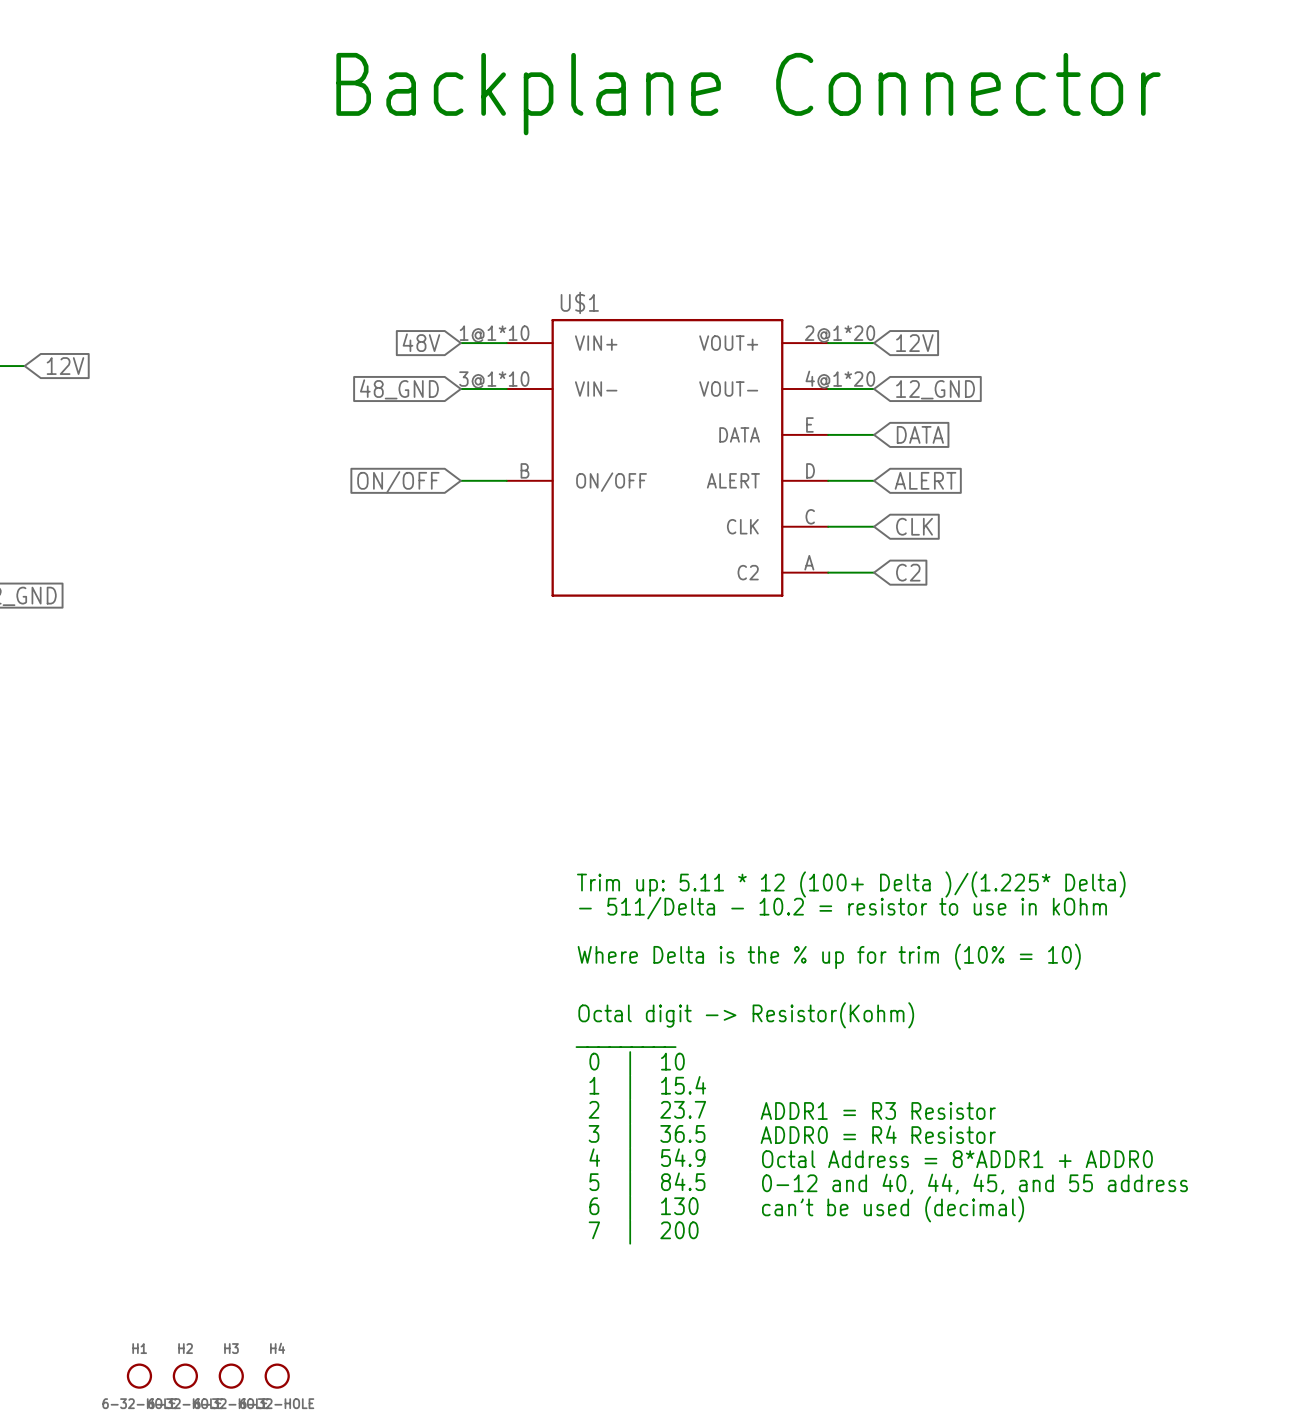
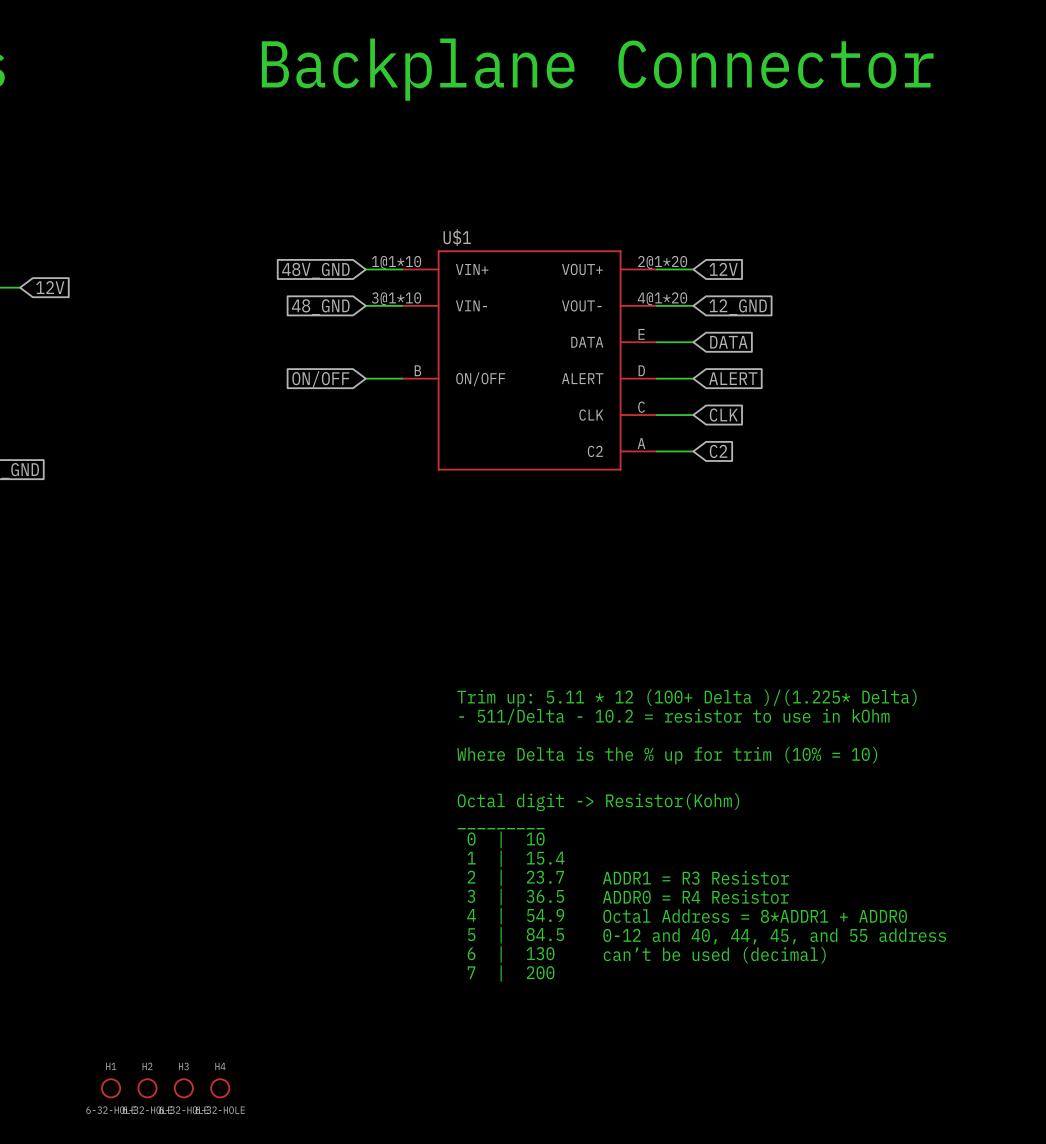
global label: 48V (421, 342) -> 48V_GND (315, 270)

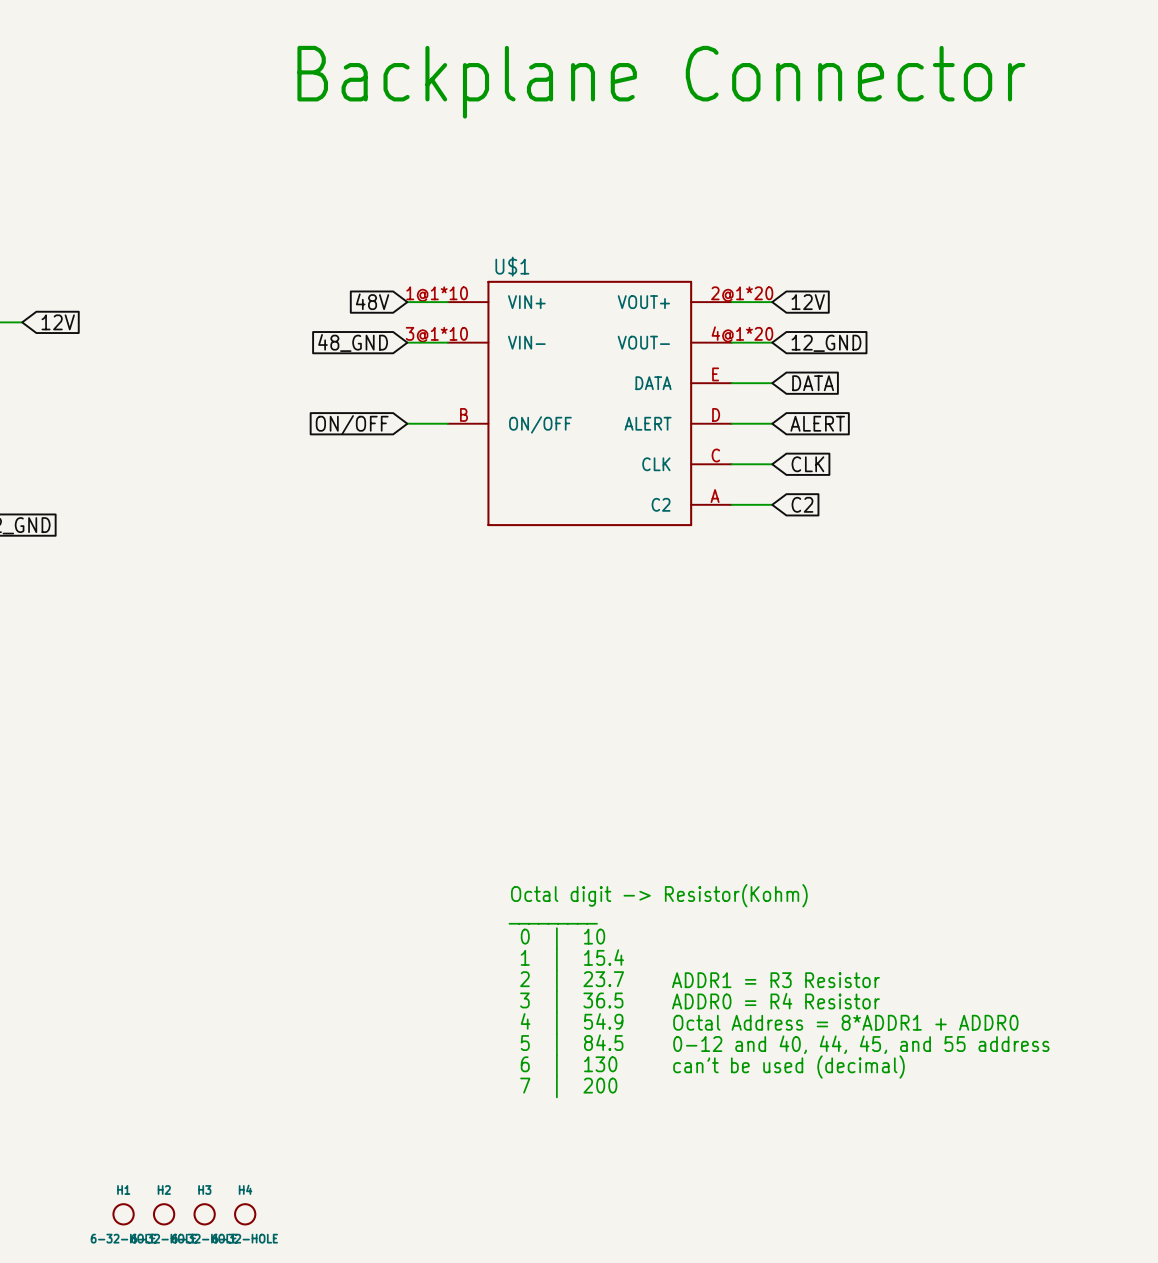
global label: 48V_GND (315, 270) -> 48V (372, 301)
text: Trim up: 5.11 * 12 (100+ Delta )/(1.225* Delta) (686, 698) -> none
text: - 511/Delta - 10.2 = resistor to use in kOhm (674, 716) -> none
text: Where Delta is the % up for trim (10% = 10) (667, 755) -> none

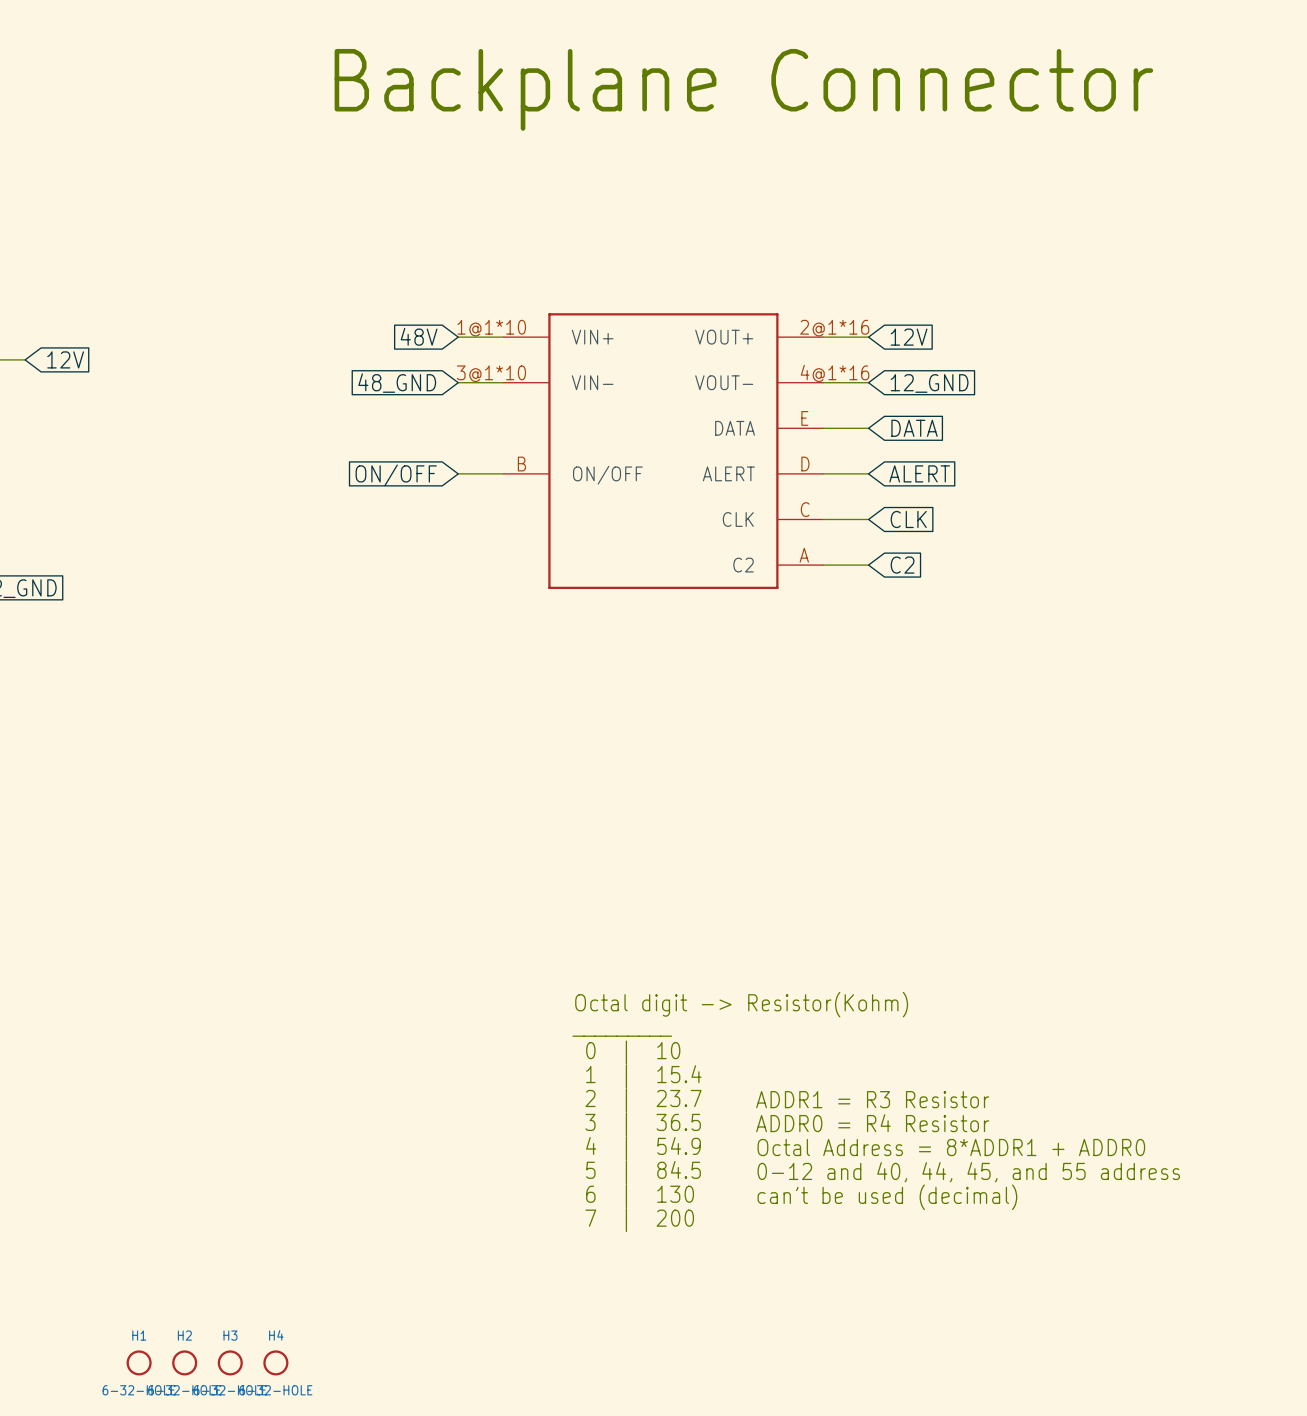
U$1 name: U$1 (512, 266) -> none
U$1 pin number: 2@1*20 (742, 294) -> 2@1*16 (834, 328)
U$1 pin number: 4@1*20 (742, 334) -> 4@1*16 (835, 373)

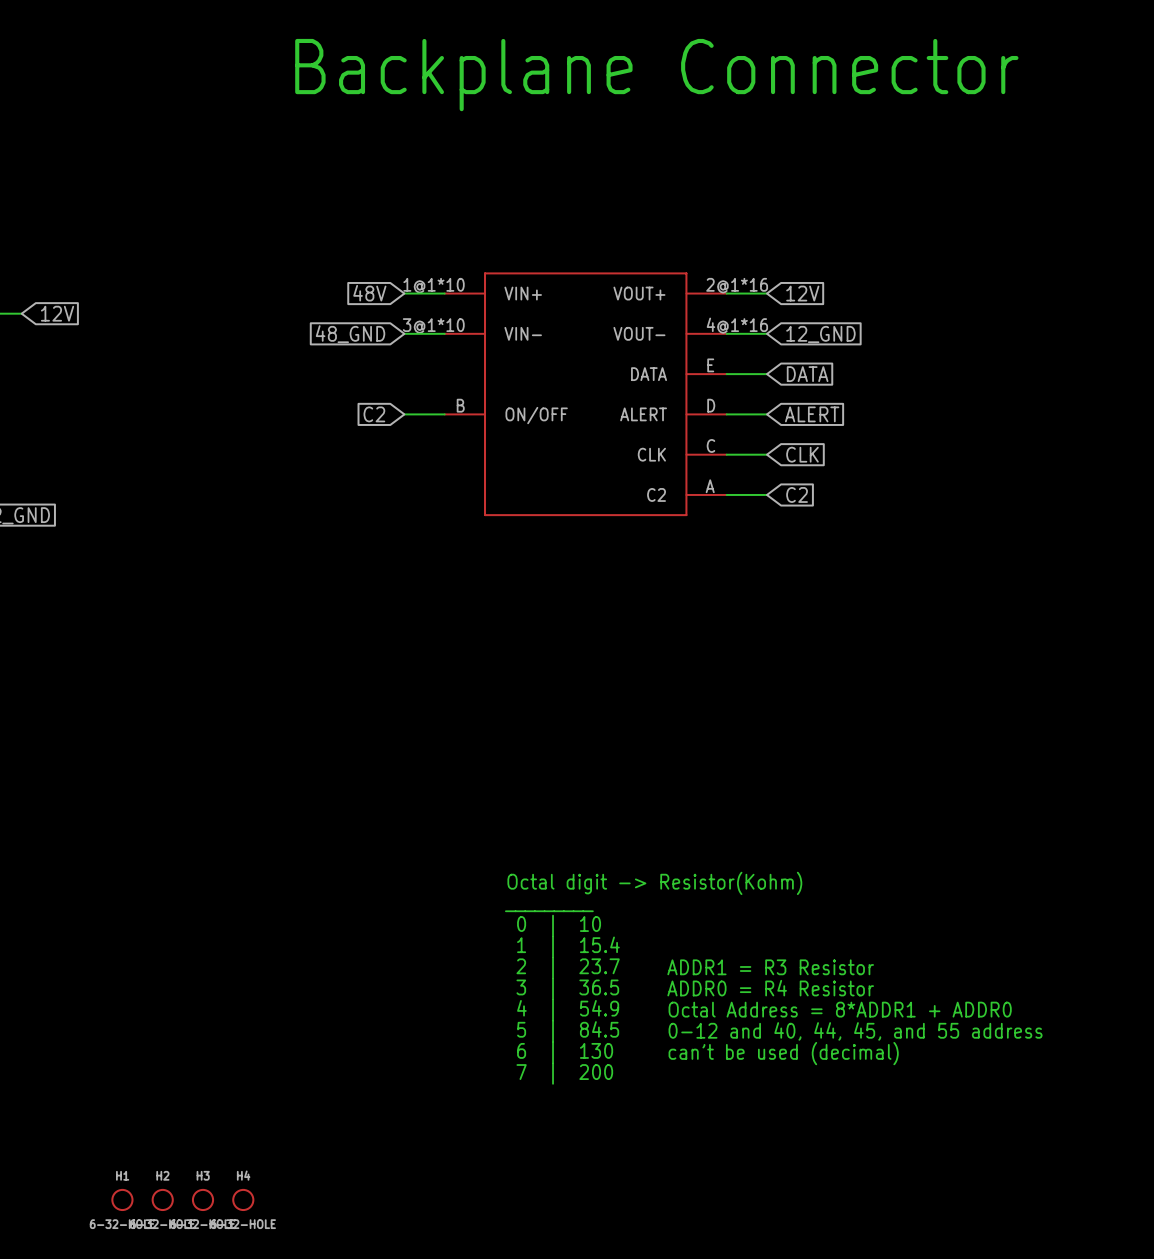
global label: ON/OFF (396, 475) -> C2 (374, 414)

